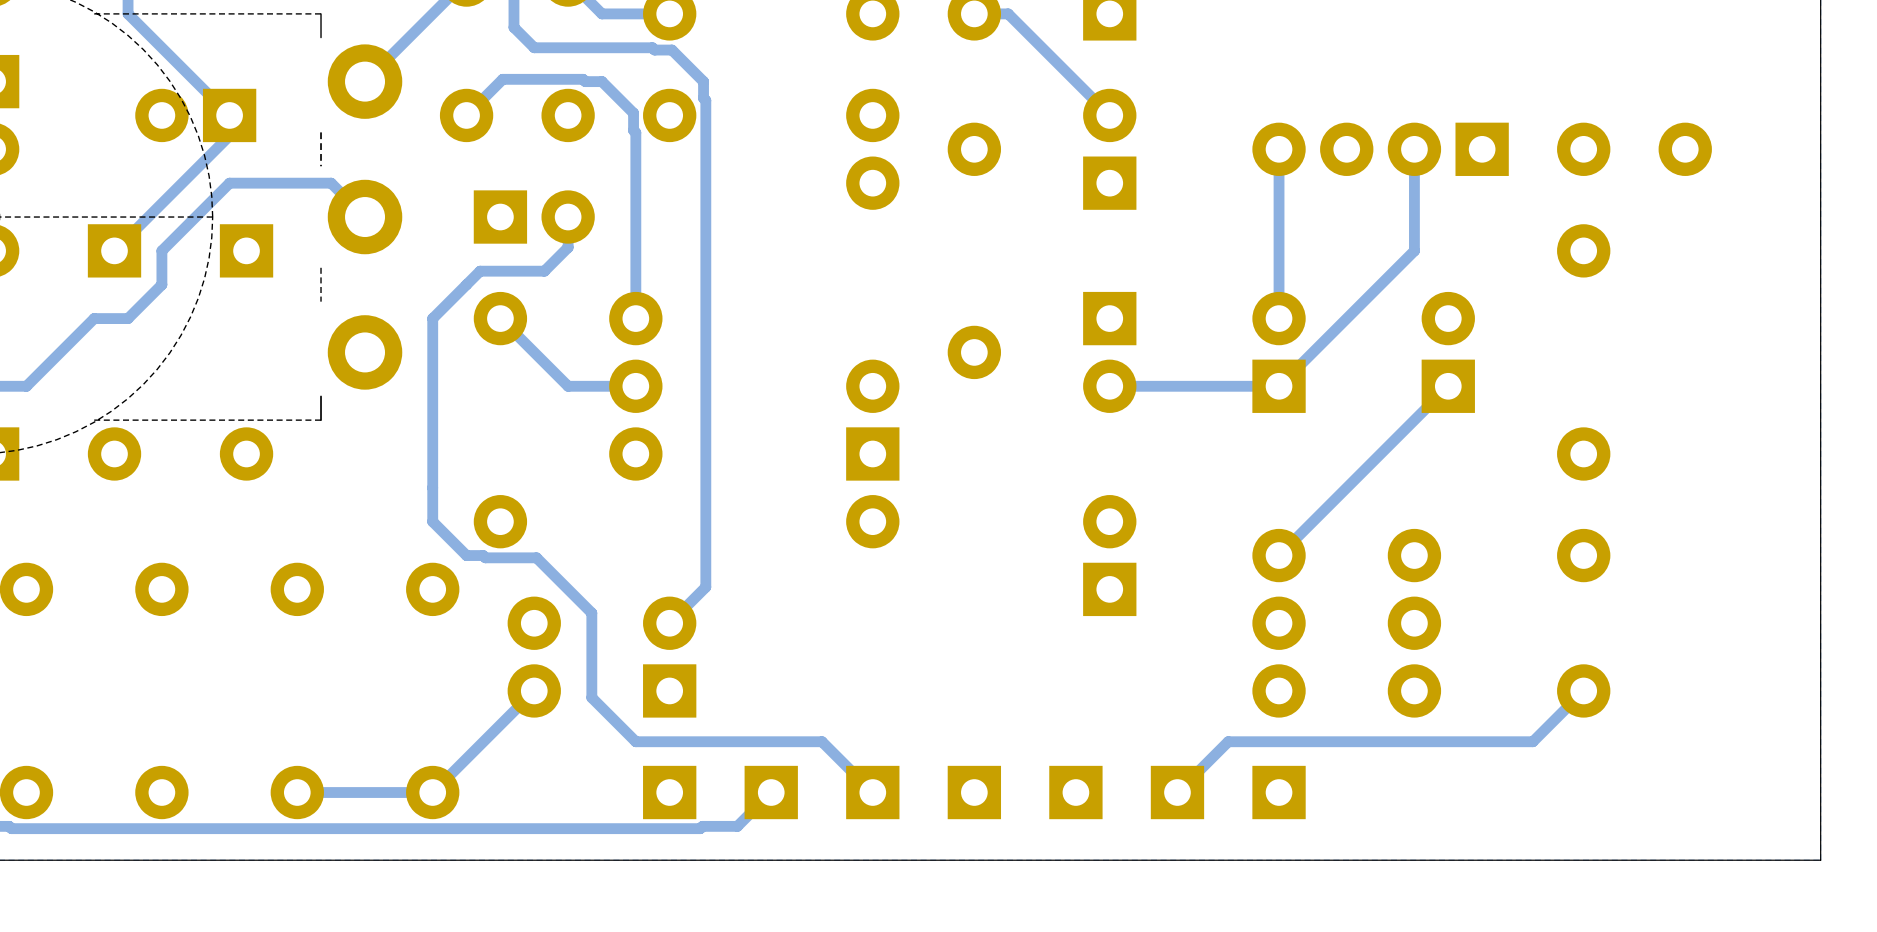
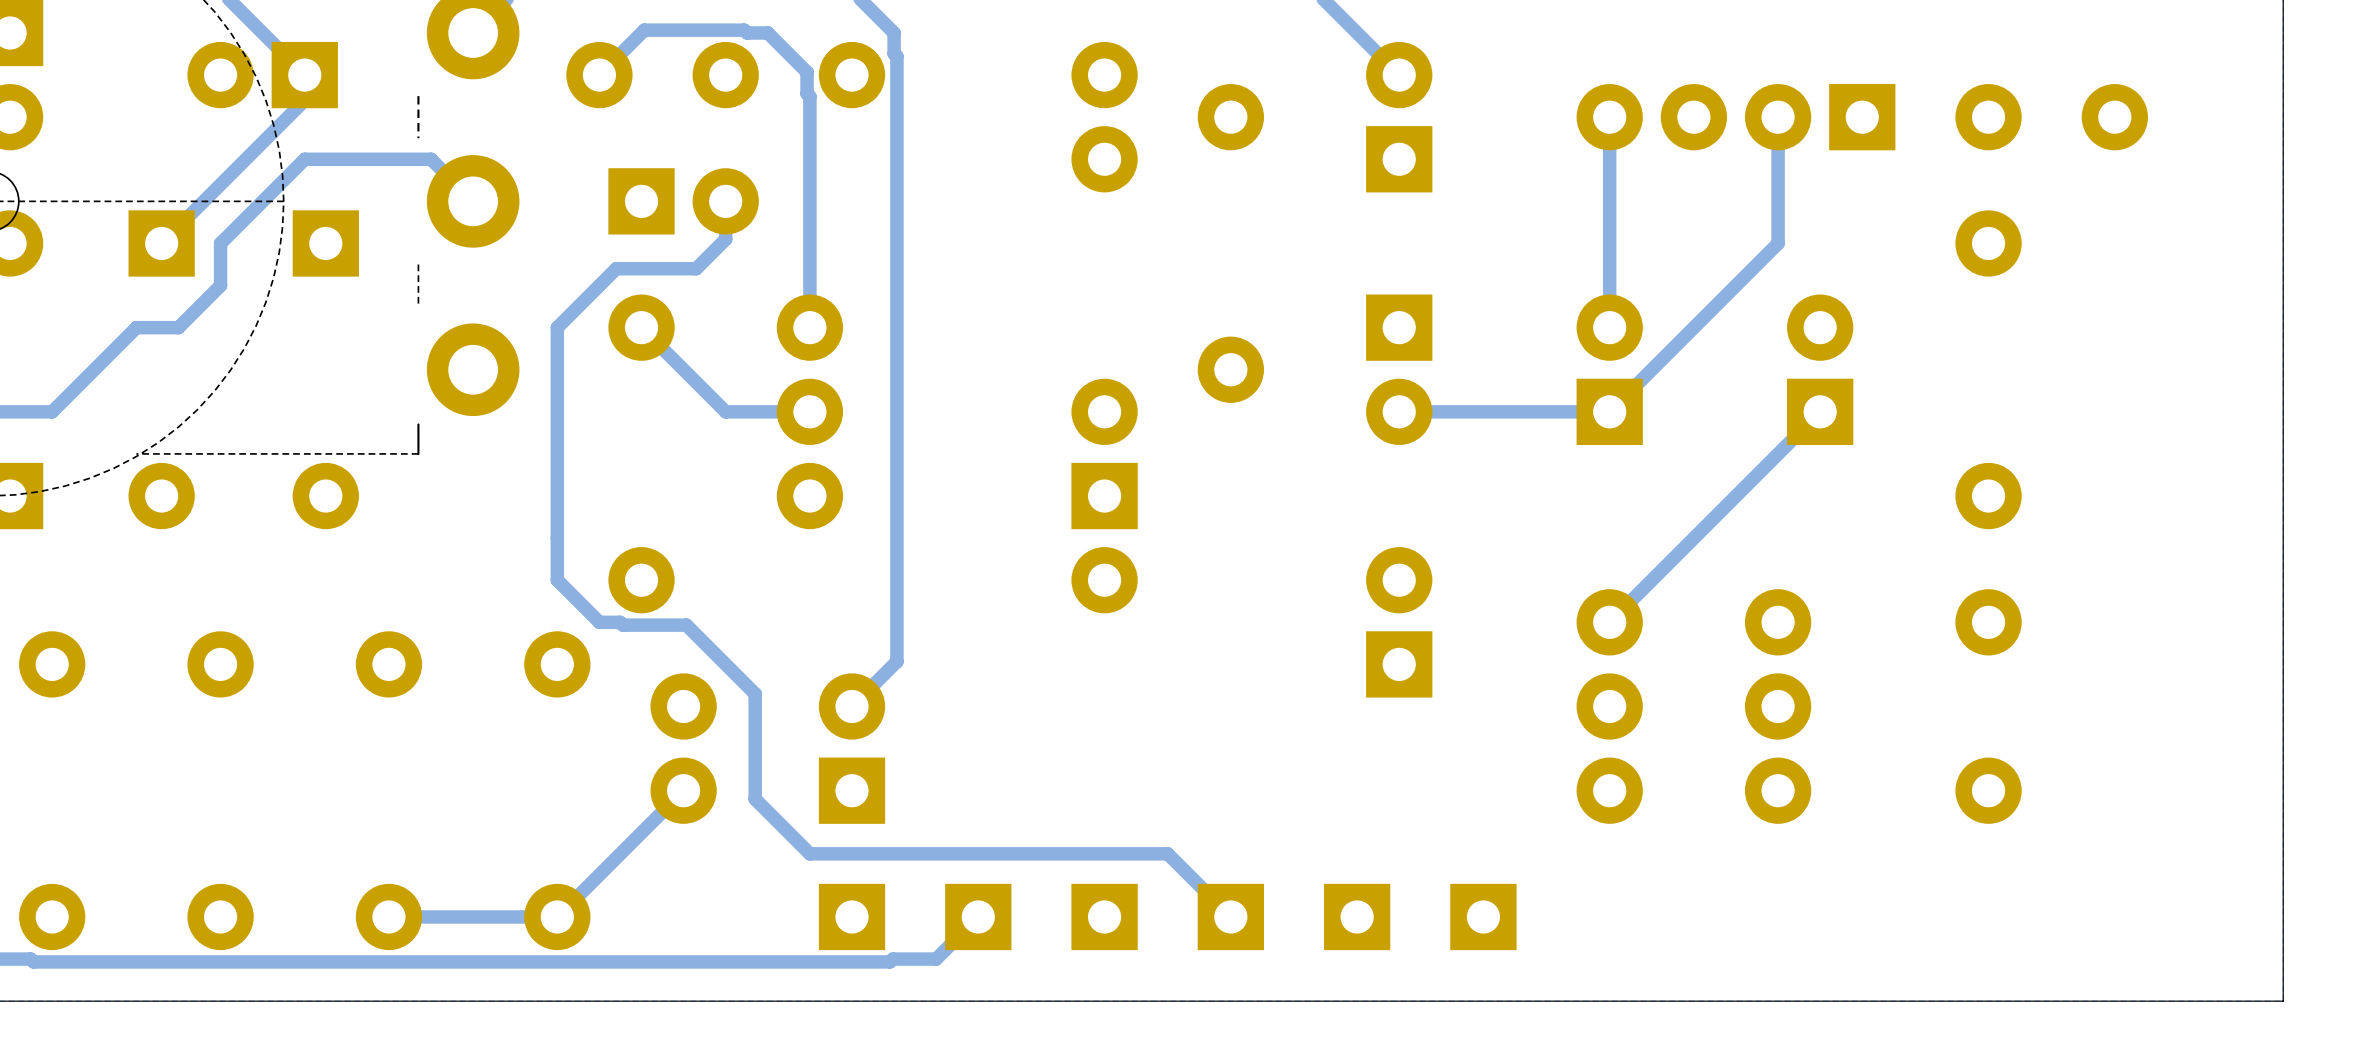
track: (1583, 690) (1532, 741) (1228, 741) (1177, 792) -> none
track: (822, 741) (872, 792) -> (1041, 853) (1167, 853) (1230, 916)
part: (1279, 792) -> none

